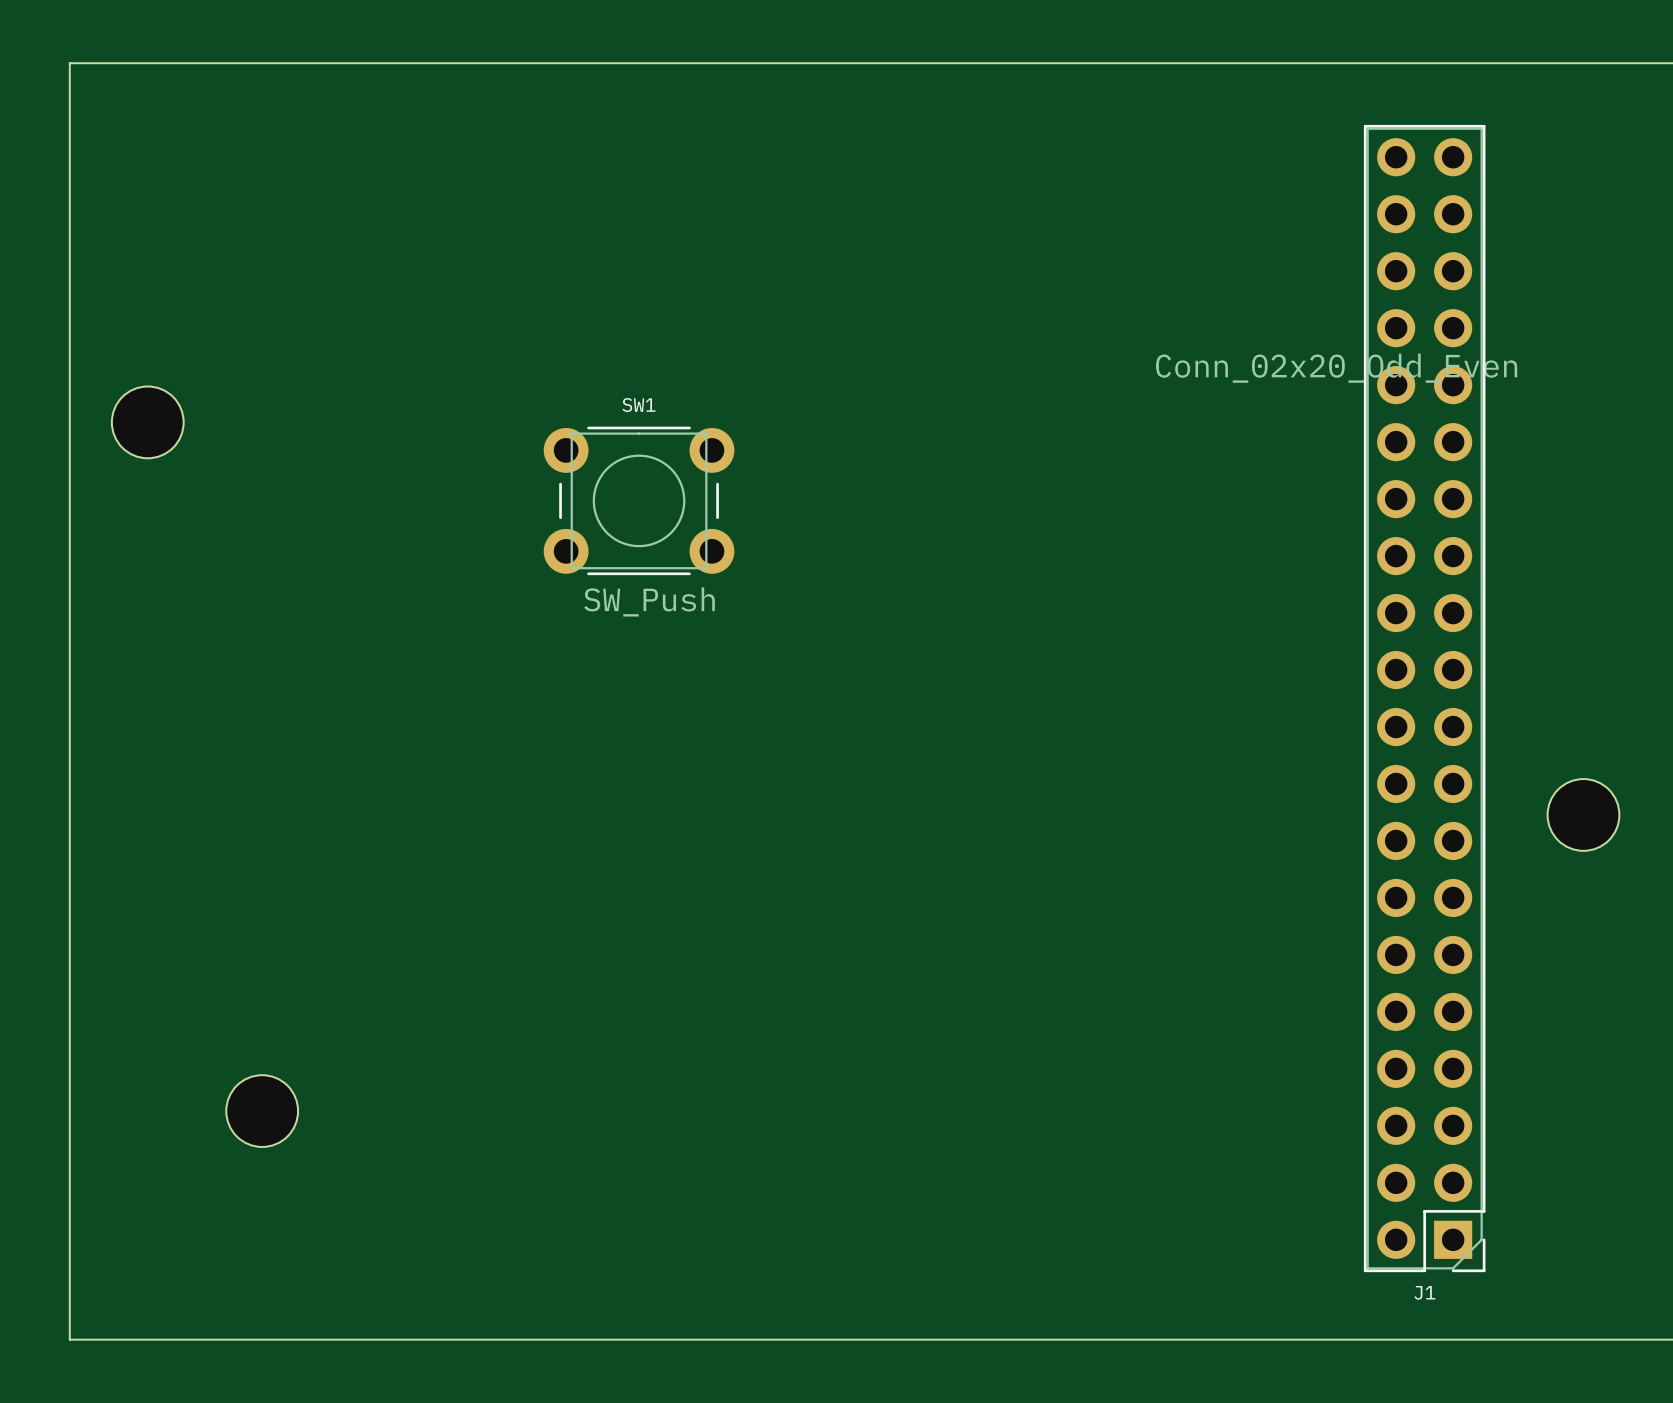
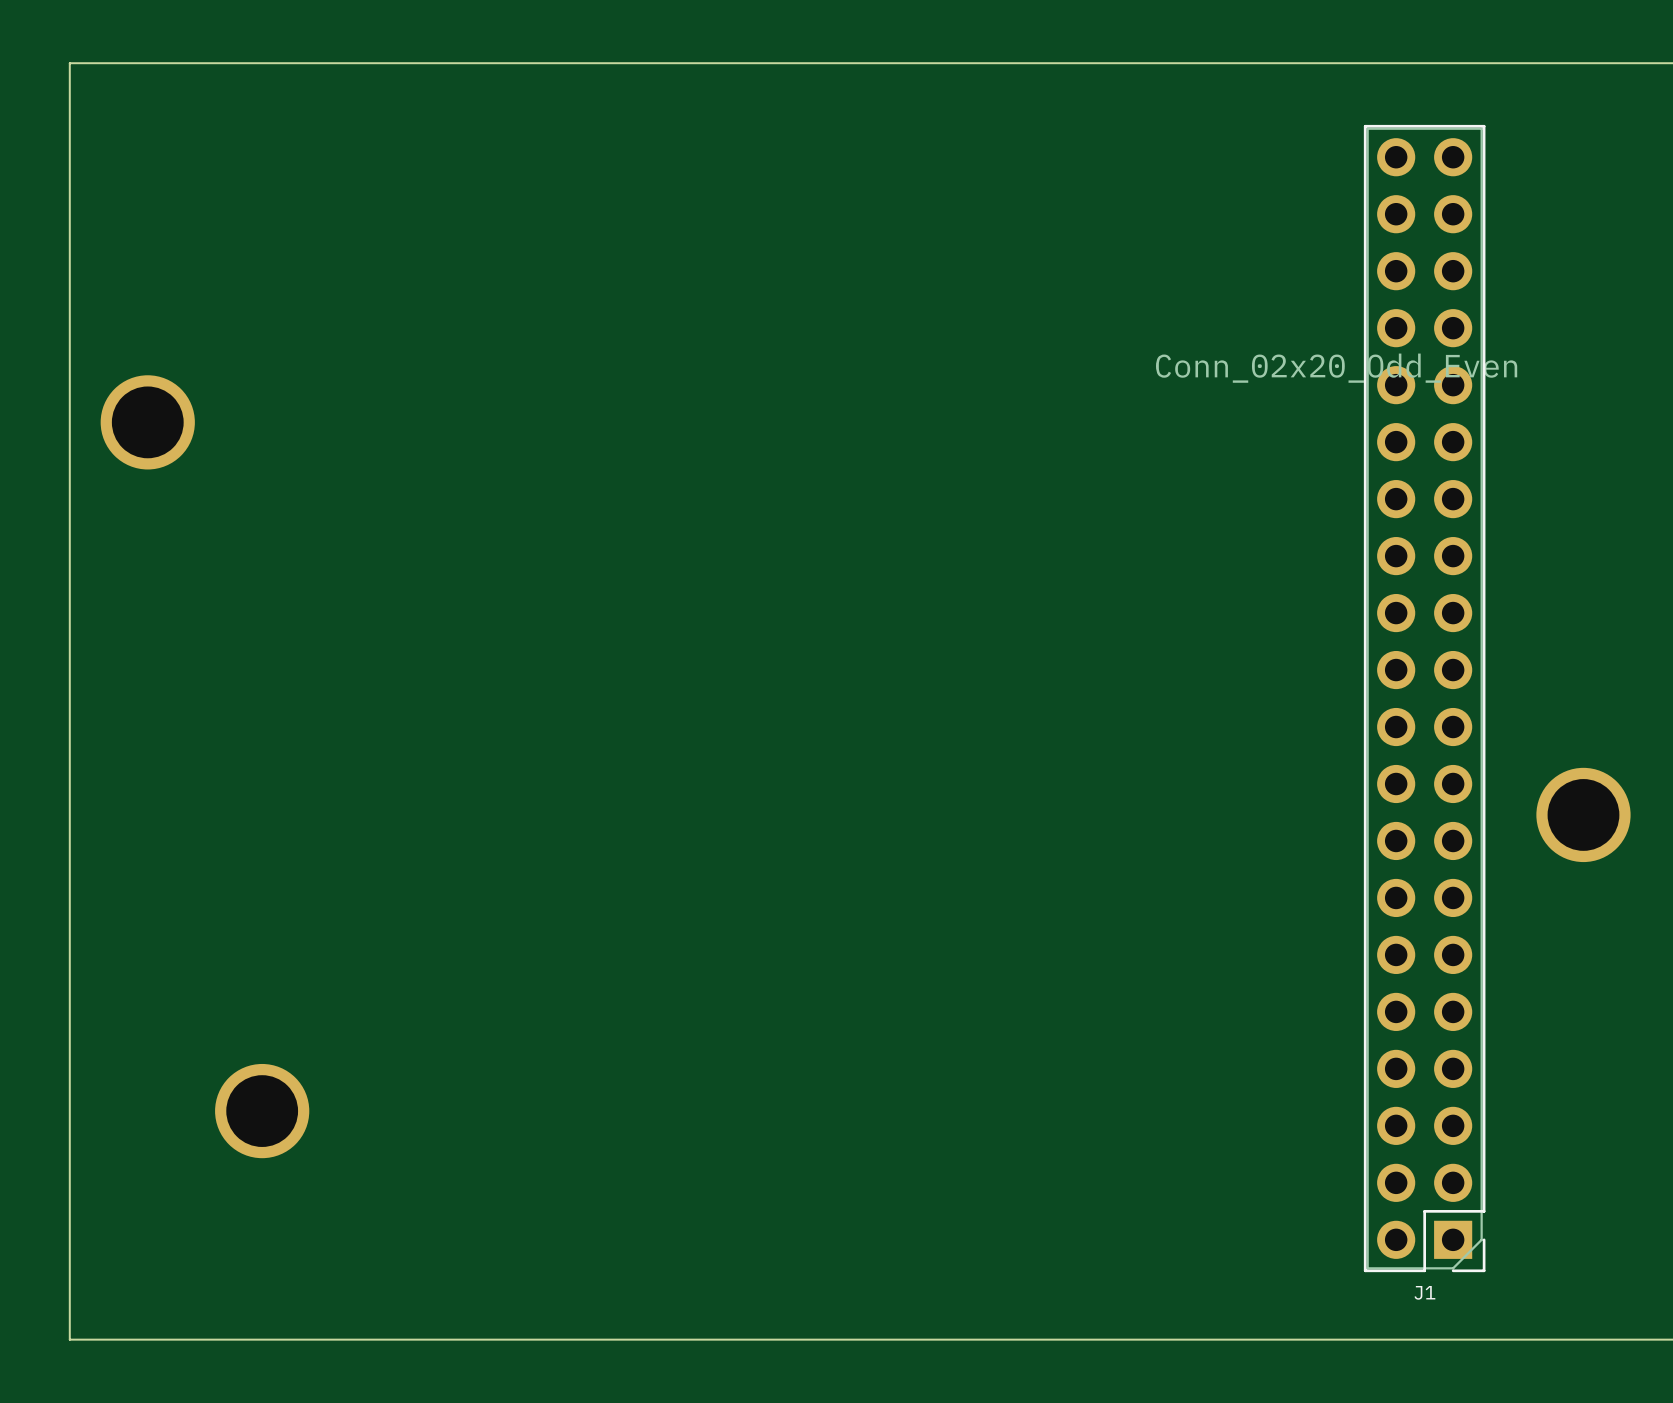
part footprint: [111, 386, 184, 459] -> [100, 375, 195, 470]
SW1: SW_Push (639, 500) -> none
part footprint: [1547, 779, 1620, 851] -> [1536, 767, 1631, 863]
part footprint: [226, 1075, 299, 1147] -> [215, 1063, 310, 1159]

